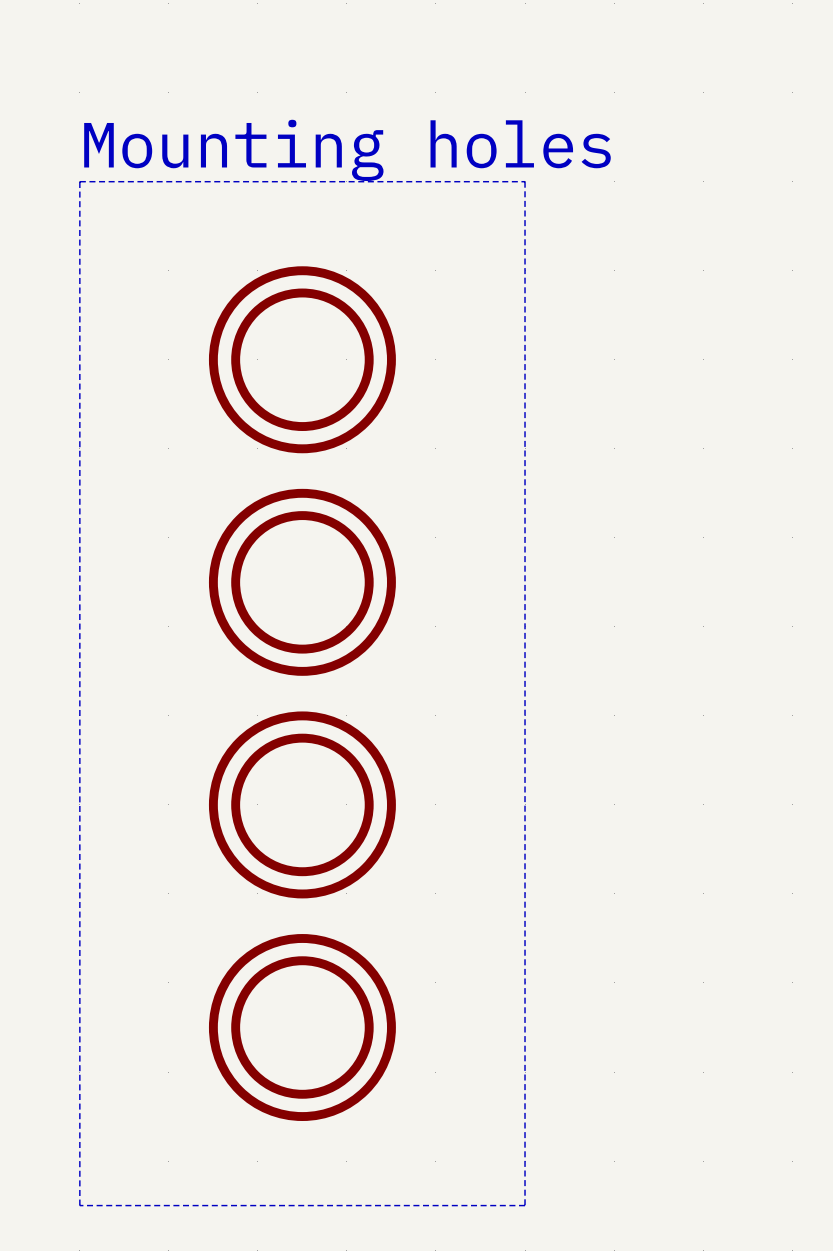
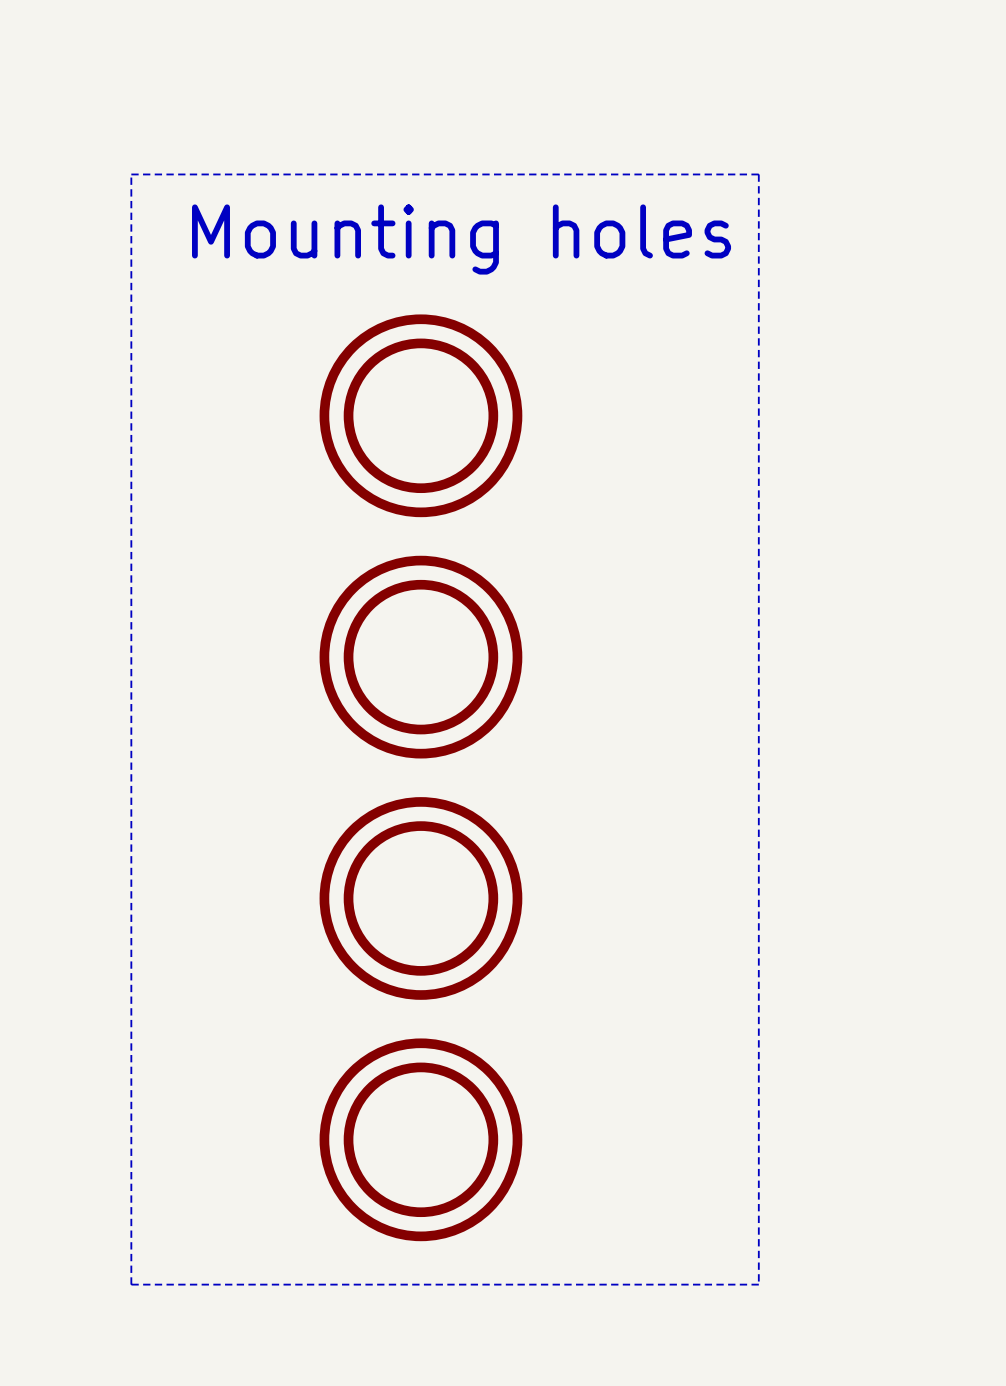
text position: Mounting holes (347, 150) -> Mounting holes (461, 239)
line: (79, 181) (525, 181) (525, 1205) (79, 1205) (79, 181) -> (131, 174) (131, 1284) (758, 1284) (758, 174) (131, 174)

